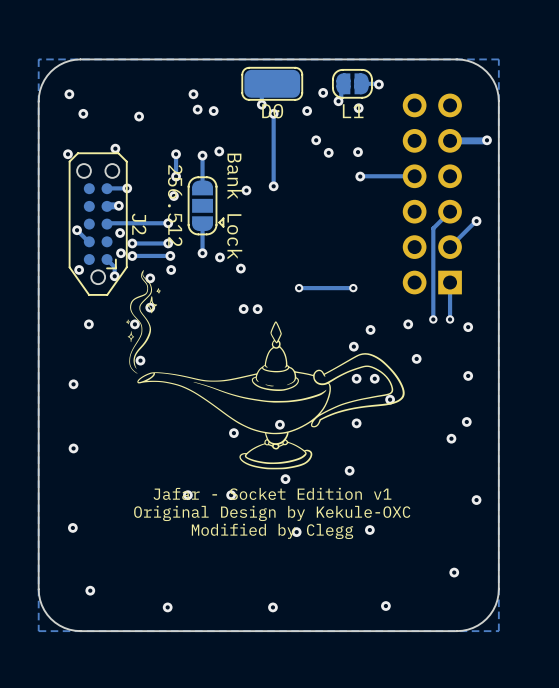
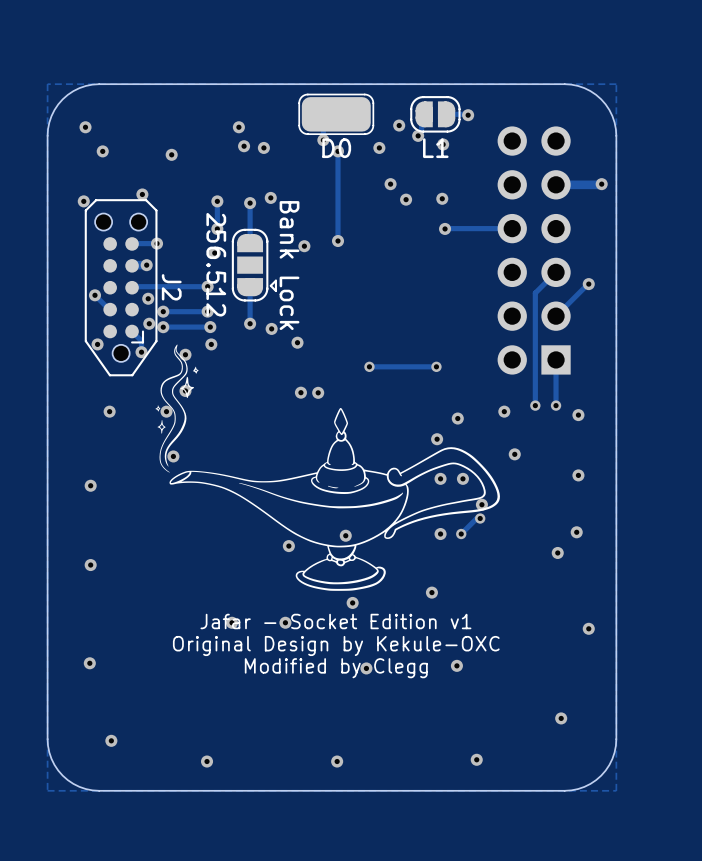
track: none -> (480, 518) (476, 518) (461, 534)
via: none -> (480, 518)
via: none -> (461, 534)

